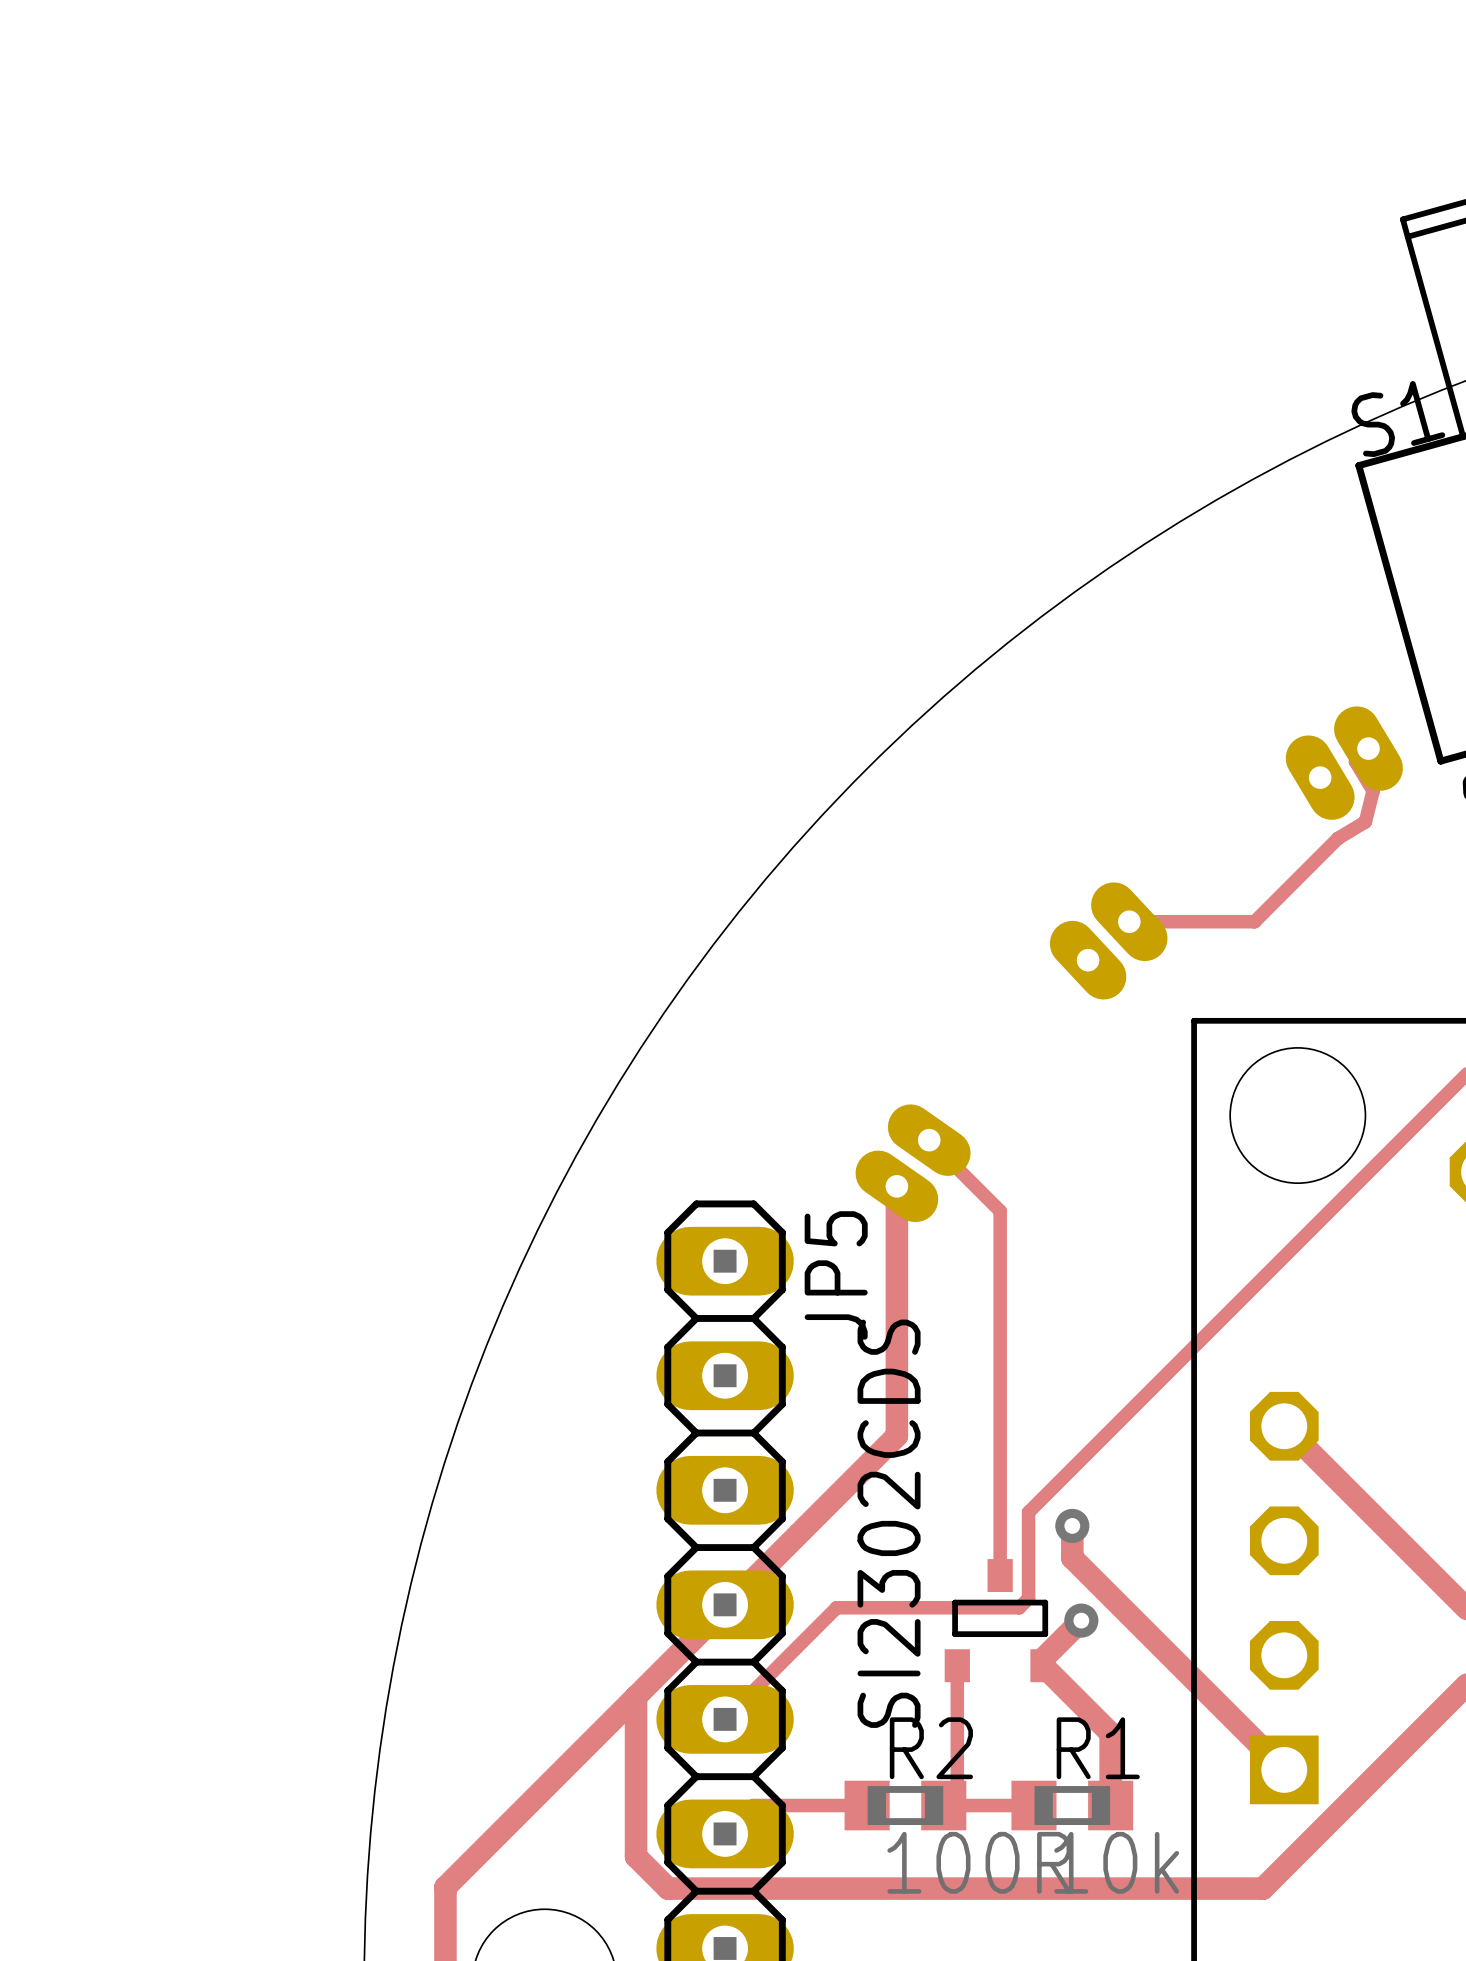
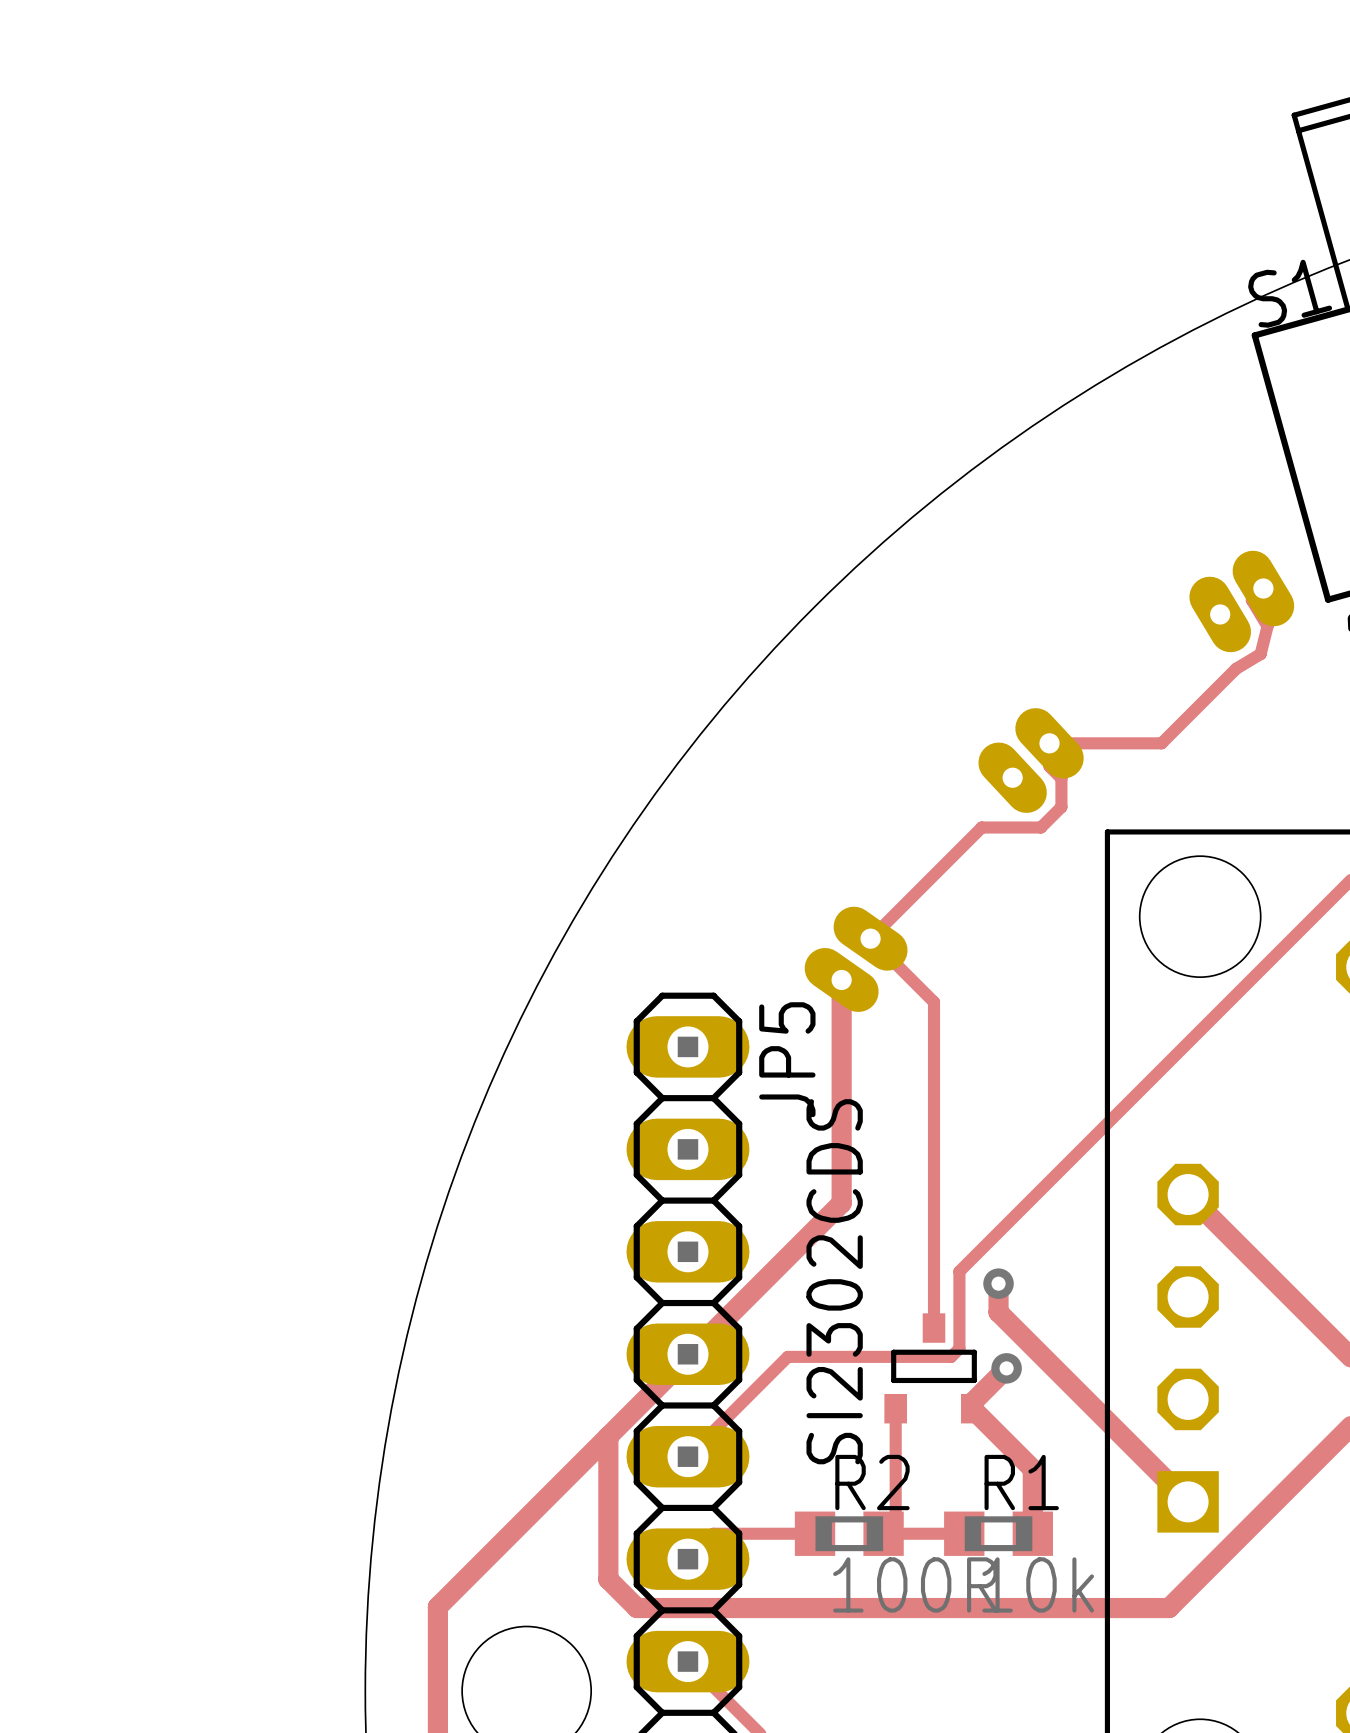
track: none -> (1049, 743) (1049, 766) (1061, 778) (1061, 807) (1040, 827) (981, 827) (870, 938)

